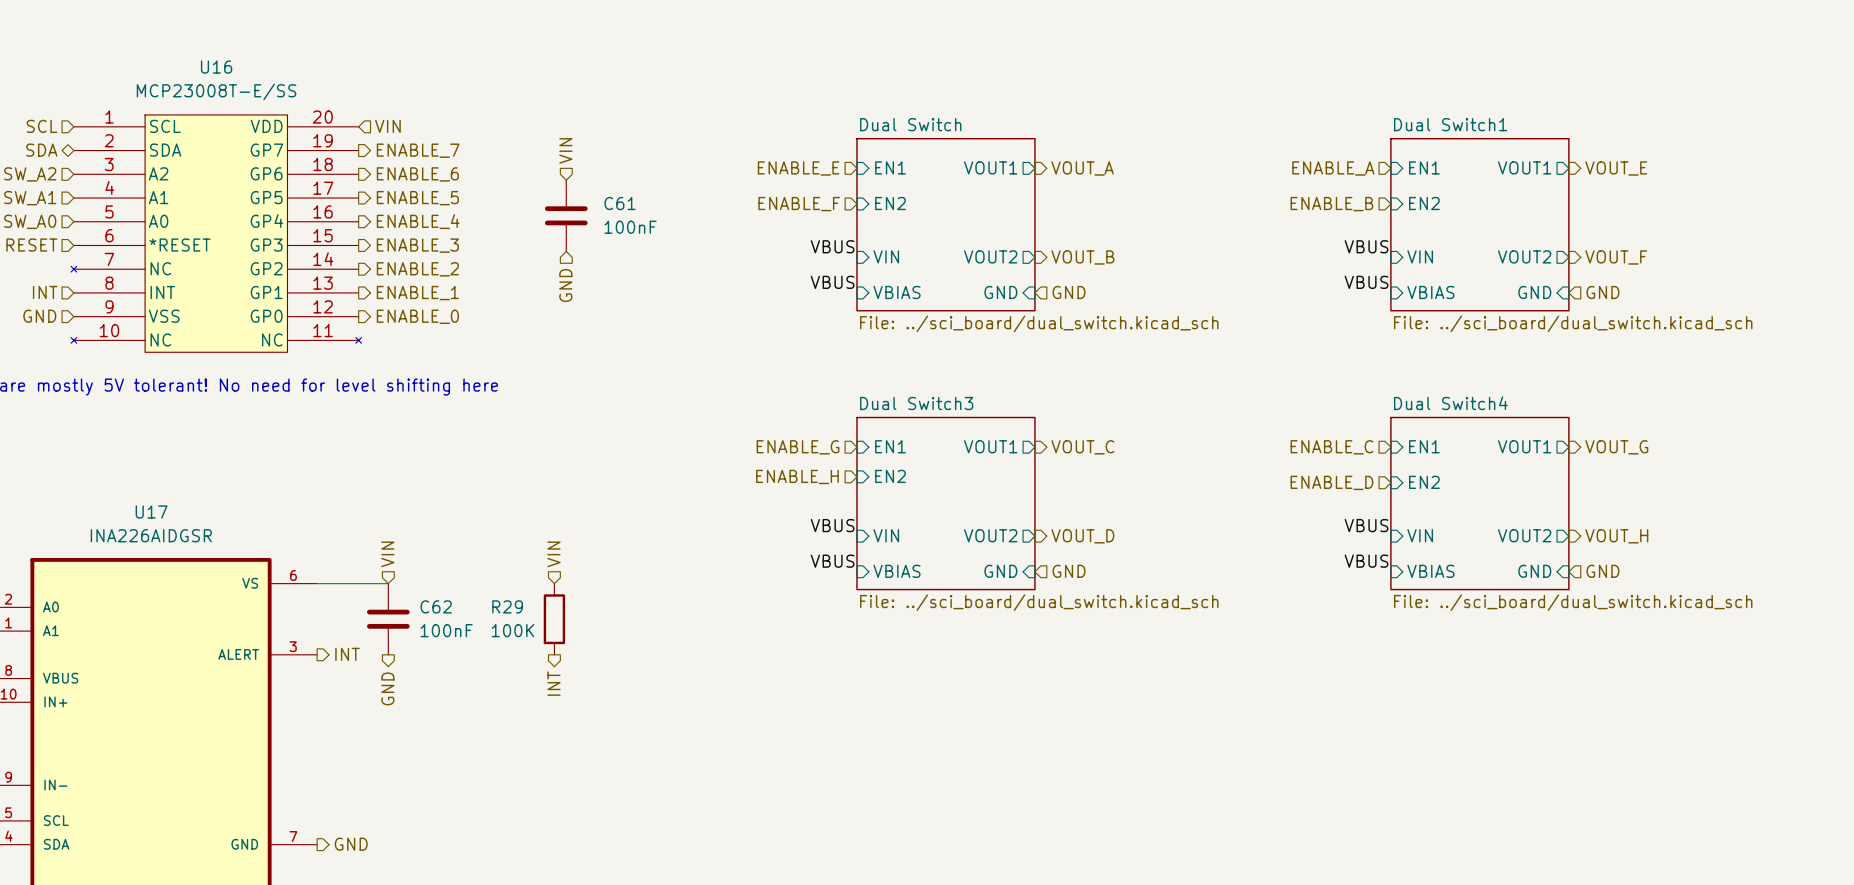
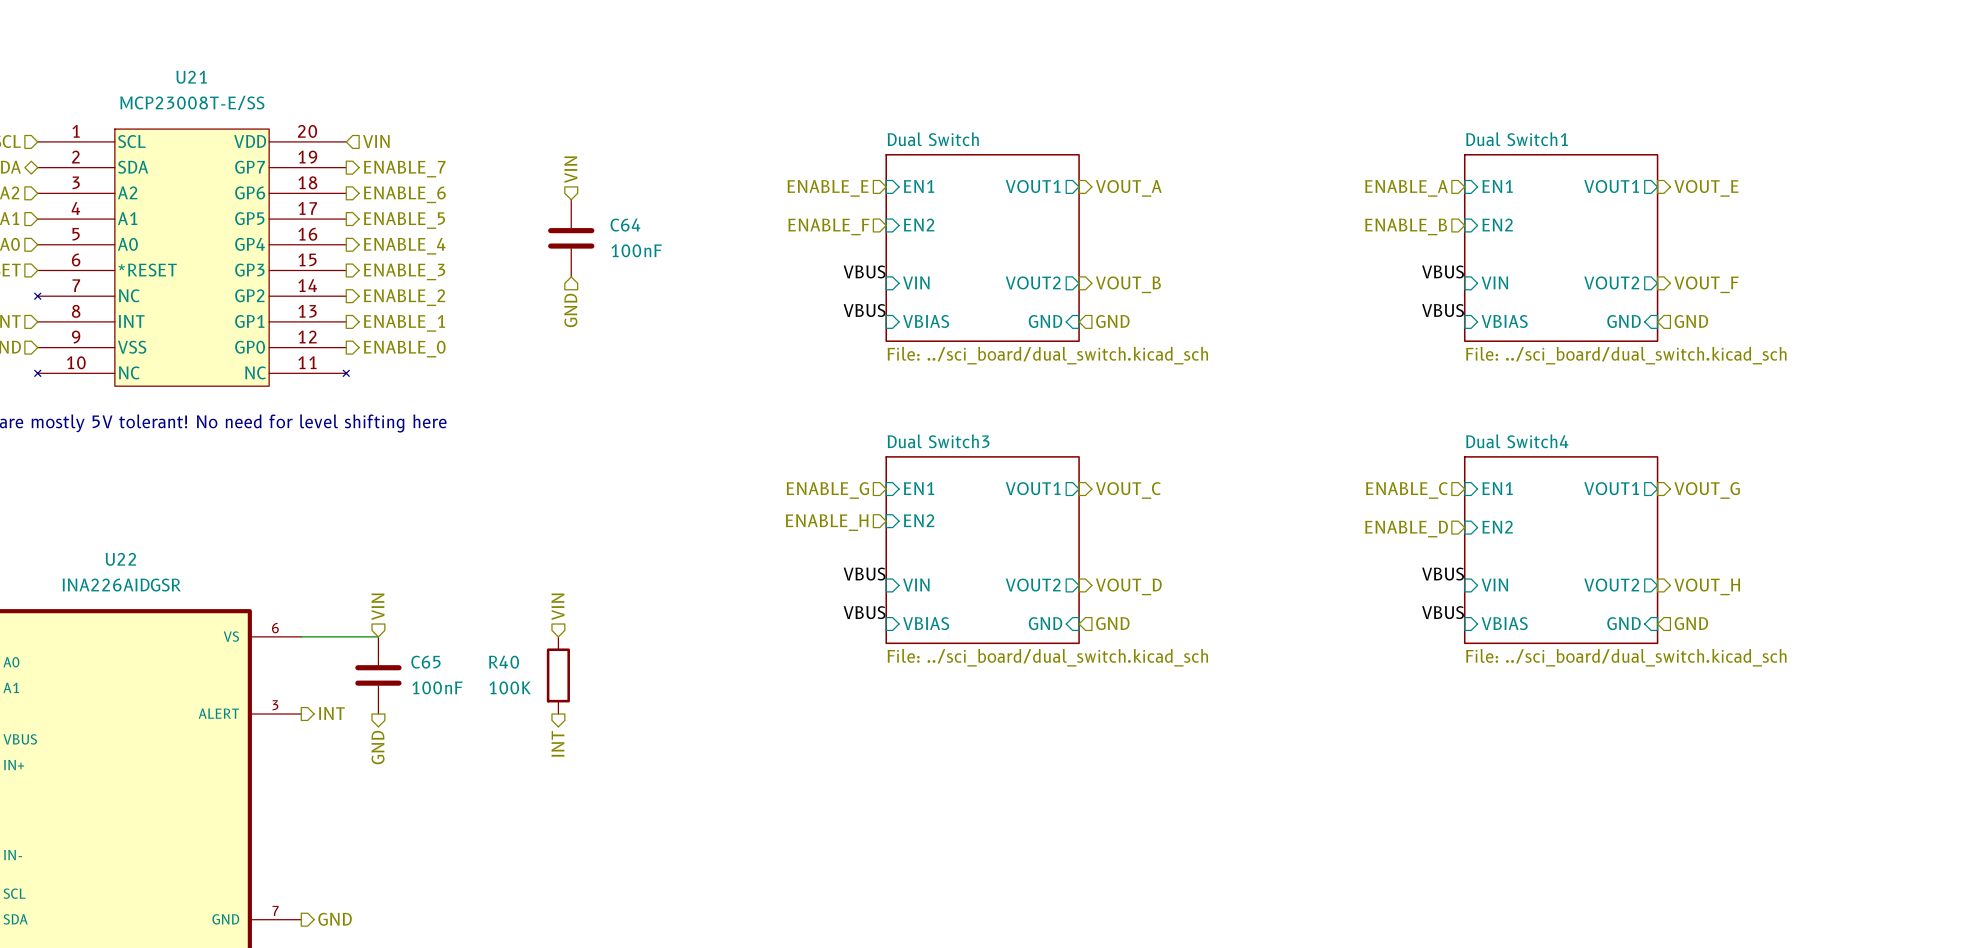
U16 name: U16 (216, 67) -> U21 (191, 77)
C61 name: C61 (620, 203) -> C64 (625, 225)
U17 name: U17 (151, 512) -> U22 (120, 559)
C62 name: C62 (436, 606) -> C65 (425, 662)
R29 name: R29 (507, 606) -> R40 (504, 662)

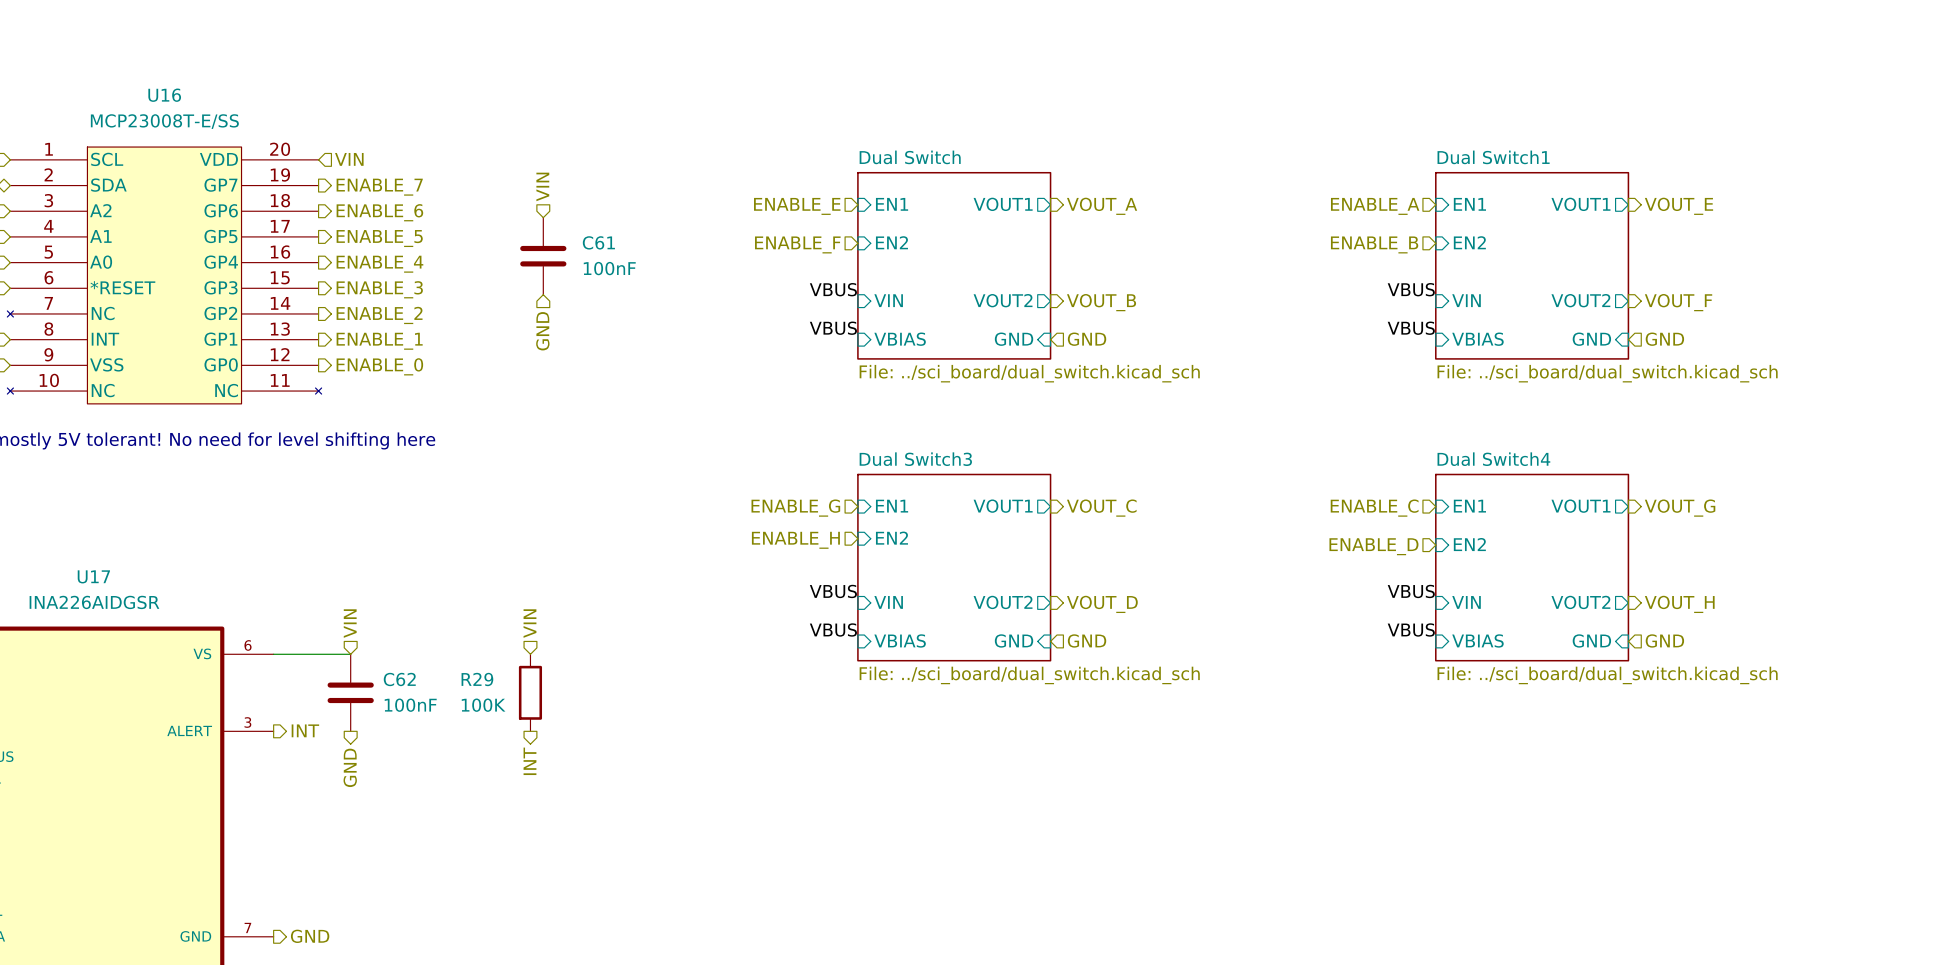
U21 name: U21 (191, 77) -> U16 (164, 95)
C64 name: C64 (625, 225) -> C61 (598, 242)
U22 name: U22 (120, 559) -> U17 (93, 576)
C65 name: C65 (425, 662) -> C62 (399, 679)
R40 name: R40 (504, 662) -> R29 (477, 679)

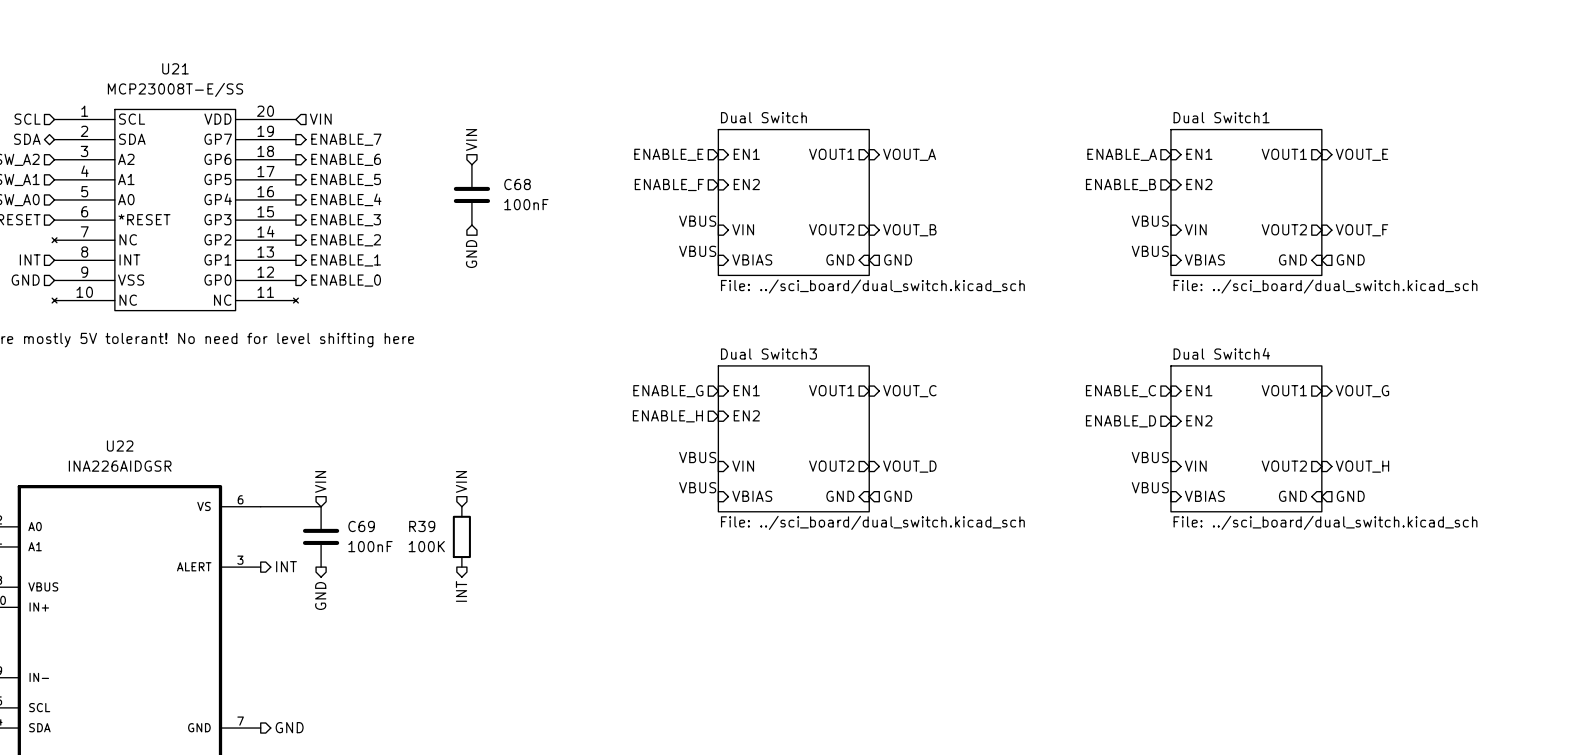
U16 name: U16 (164, 95) -> U21 (175, 68)
C61 name: C61 (598, 242) -> C68 (517, 184)
U17 name: U17 (93, 576) -> U22 (120, 446)
C62 name: C62 (399, 679) -> C69 (361, 526)
R29 name: R29 (477, 679) -> R39 (422, 526)

